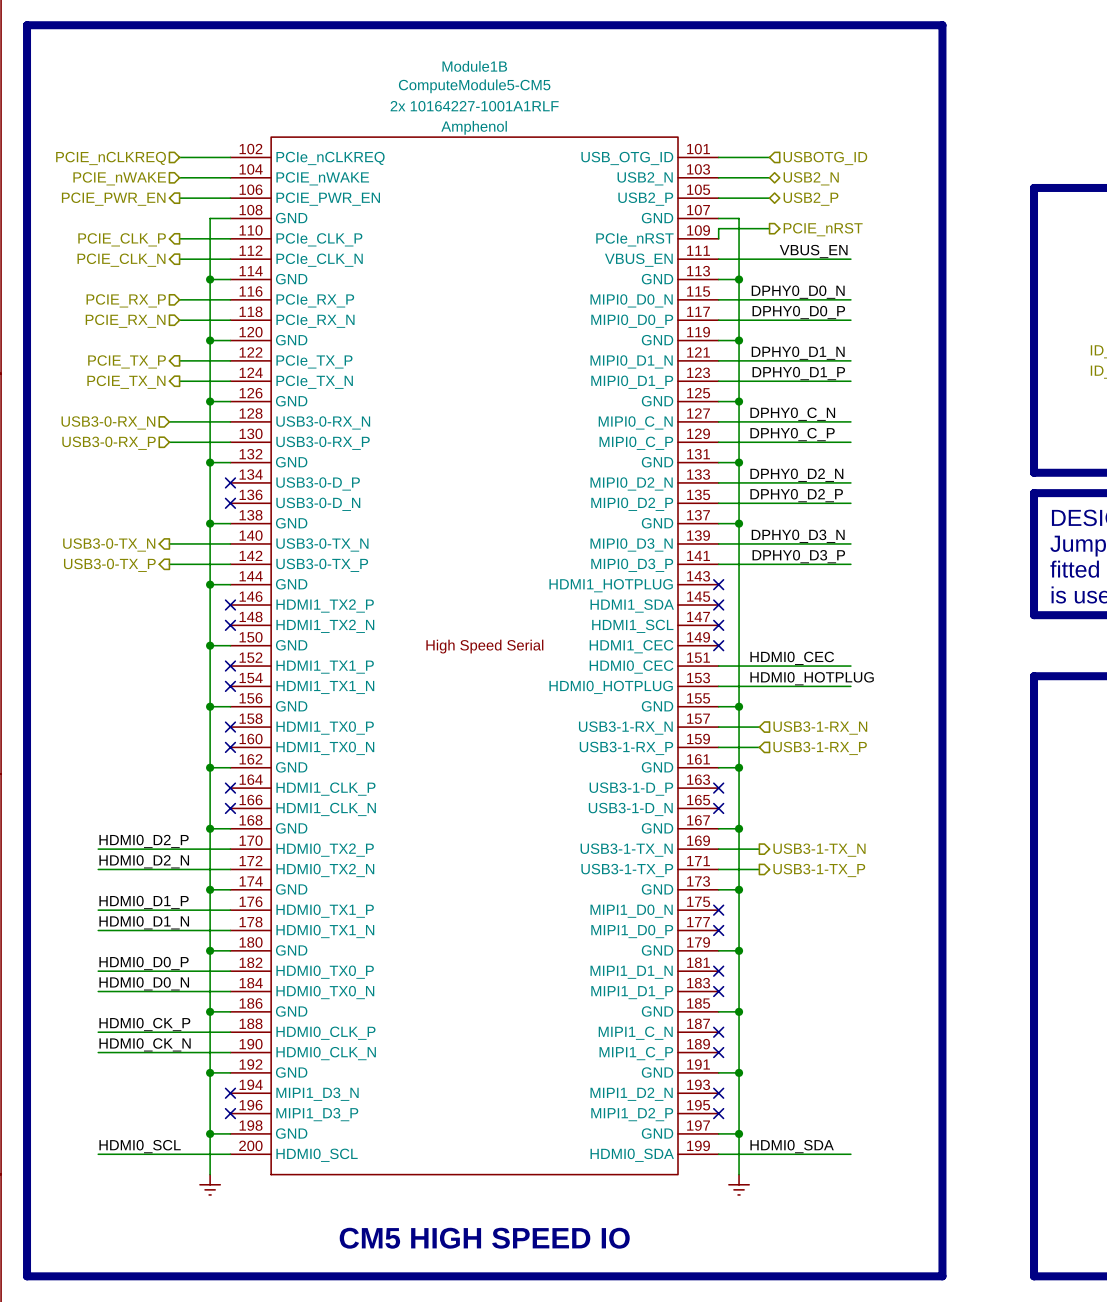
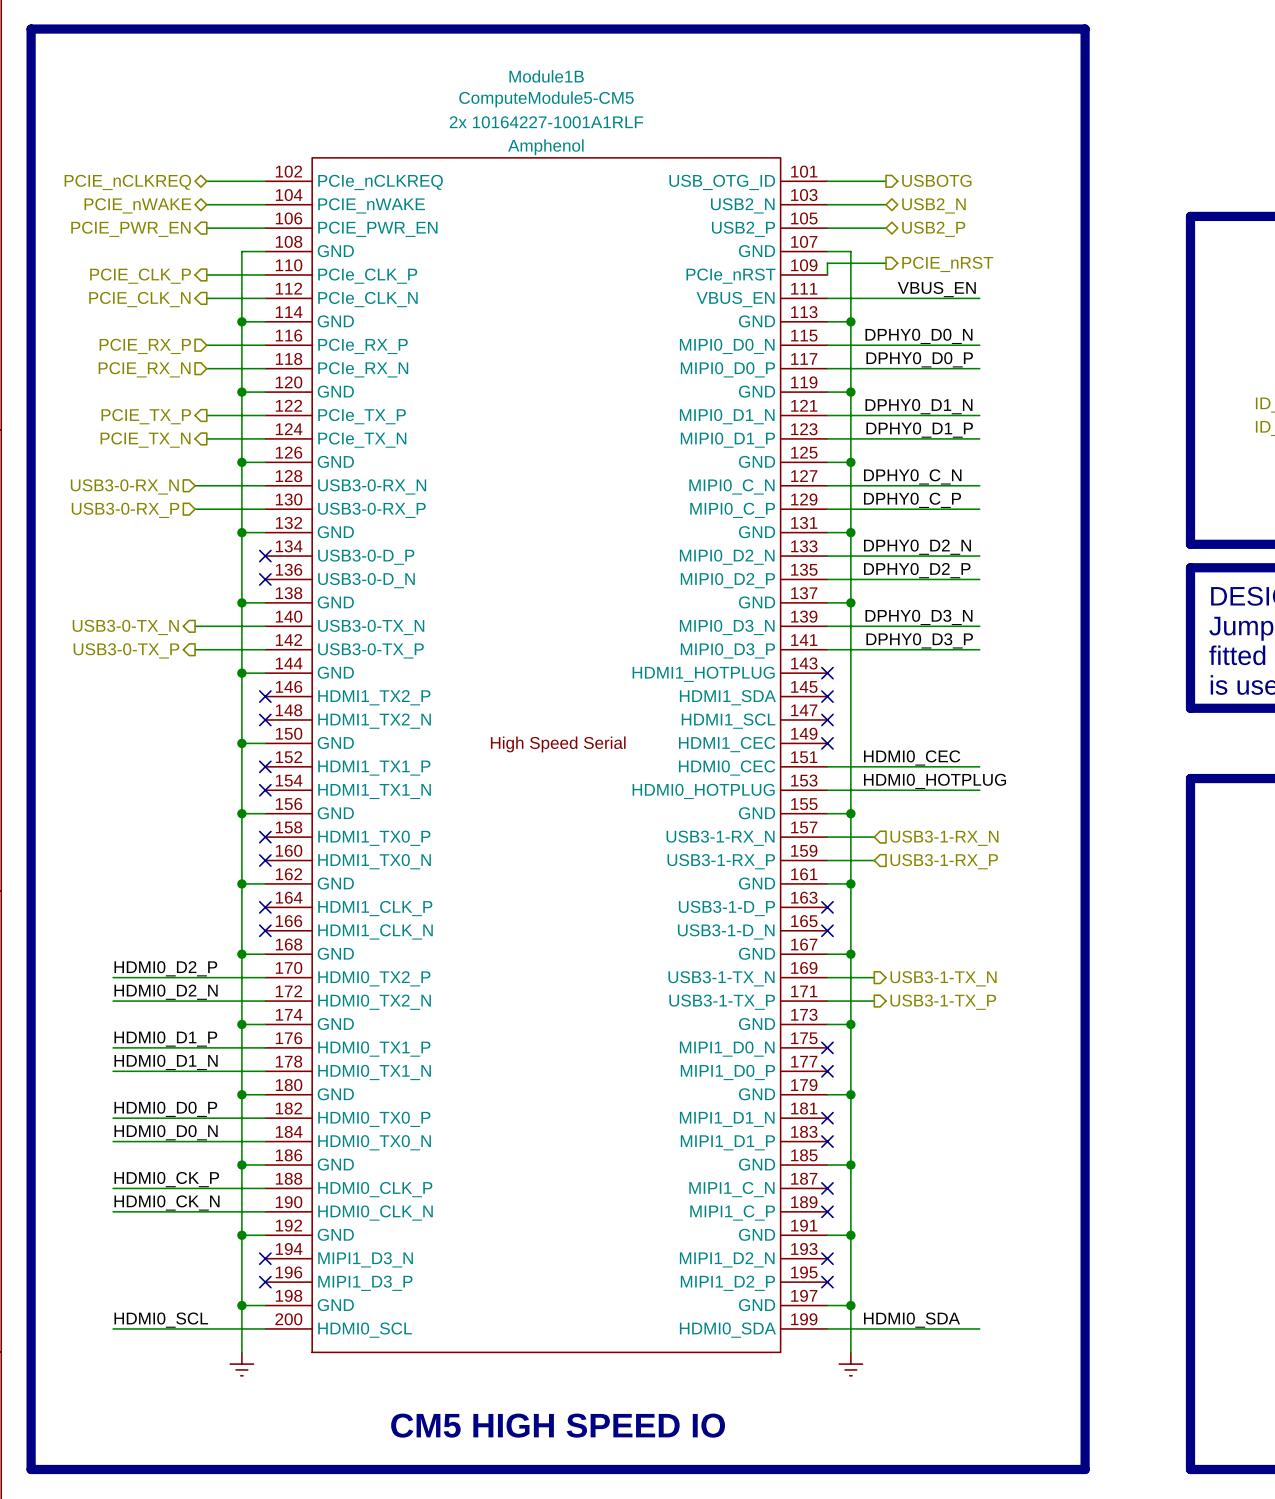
hierarchical label shape: input (111, 158) -> bidirectional (127, 182)
hierarchical label shape: input (825, 158) -> output (936, 180)
hierarchical label: USBOTG_ID (825, 158) -> USBOTG (936, 180)
hierarchical label shape: input (119, 178) -> bidirectional (137, 205)

